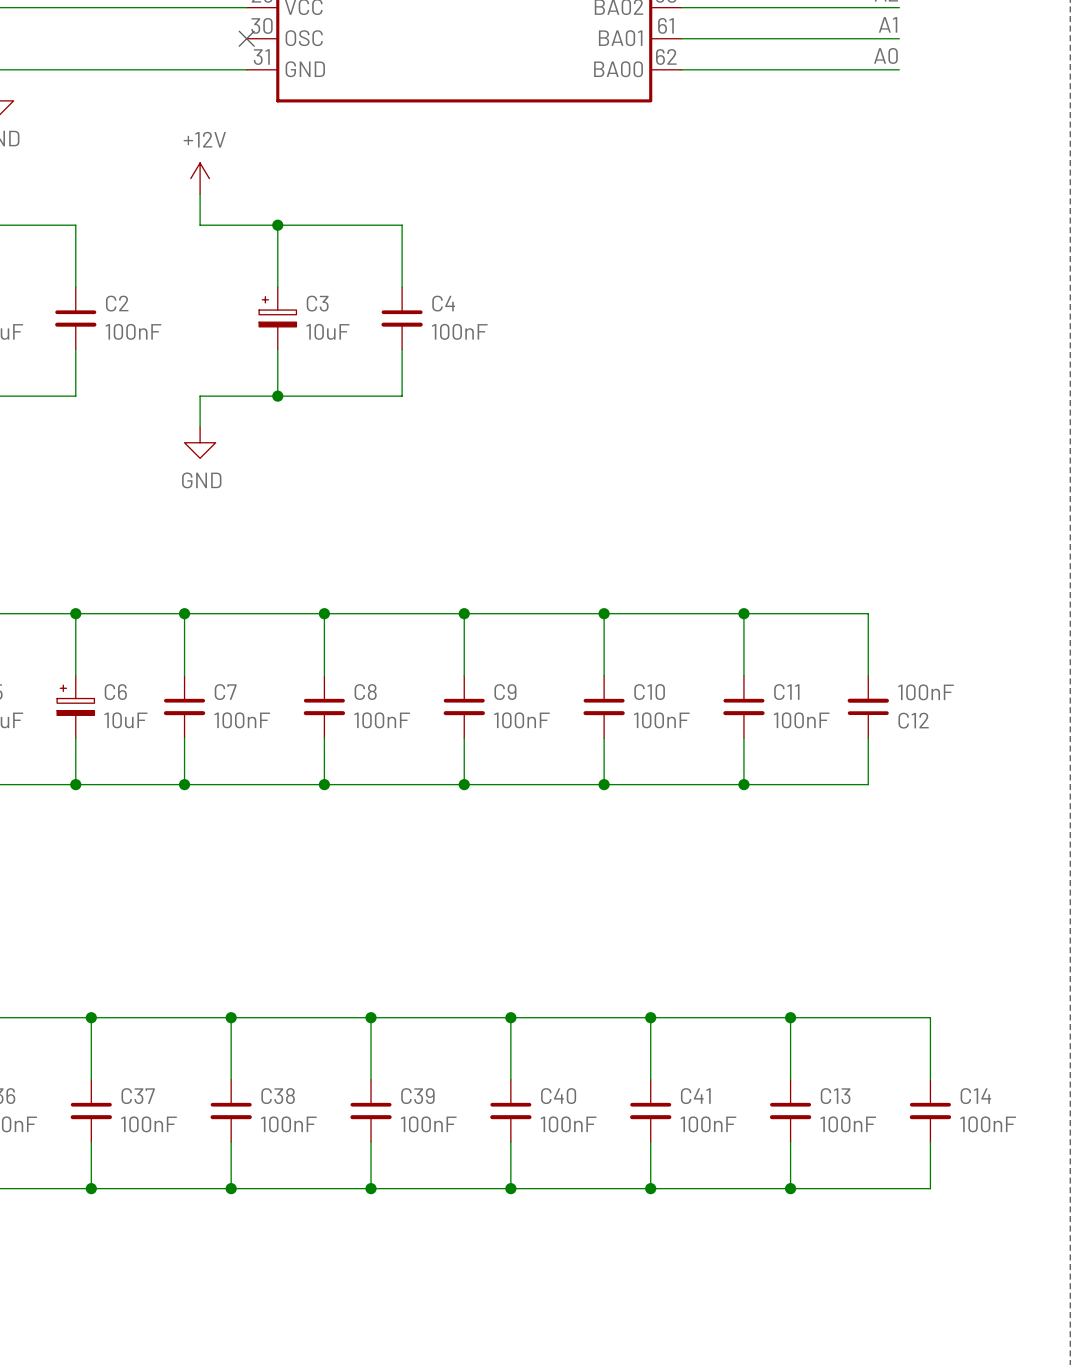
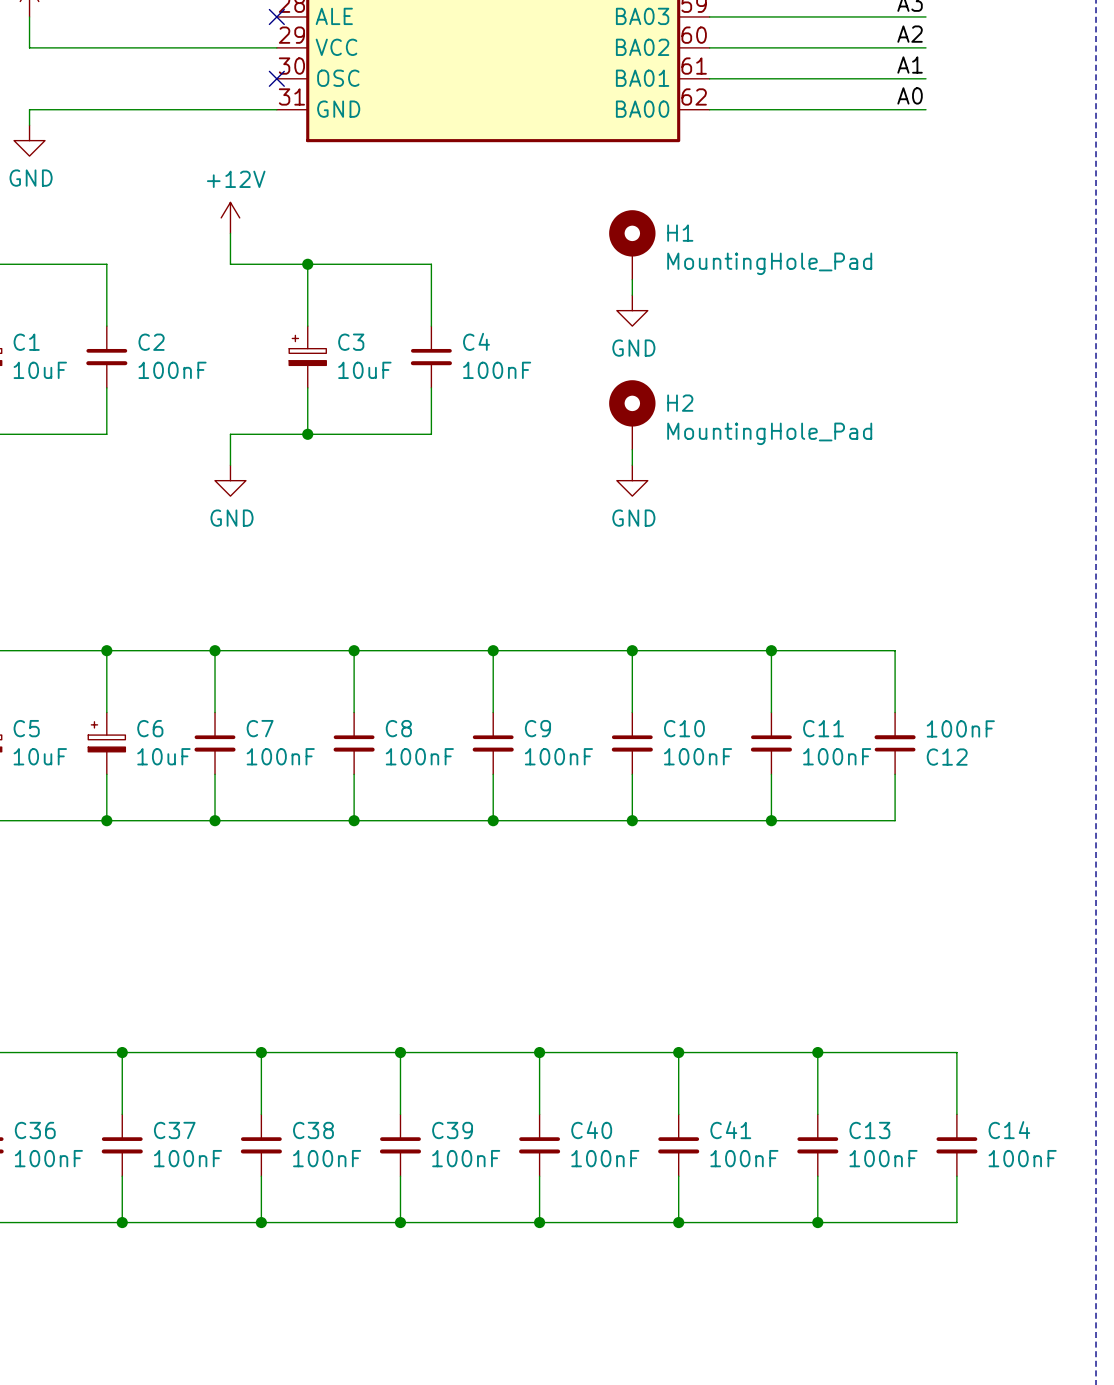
H1: none -> MountingHole_Pad (632, 244)
wire: none -> (632, 279) (632, 295)
power symbol: none -> GND (632, 310)
H2: none -> MountingHole_Pad (632, 414)
wire: none -> (632, 449) (632, 465)
power symbol: none -> GND (632, 480)

